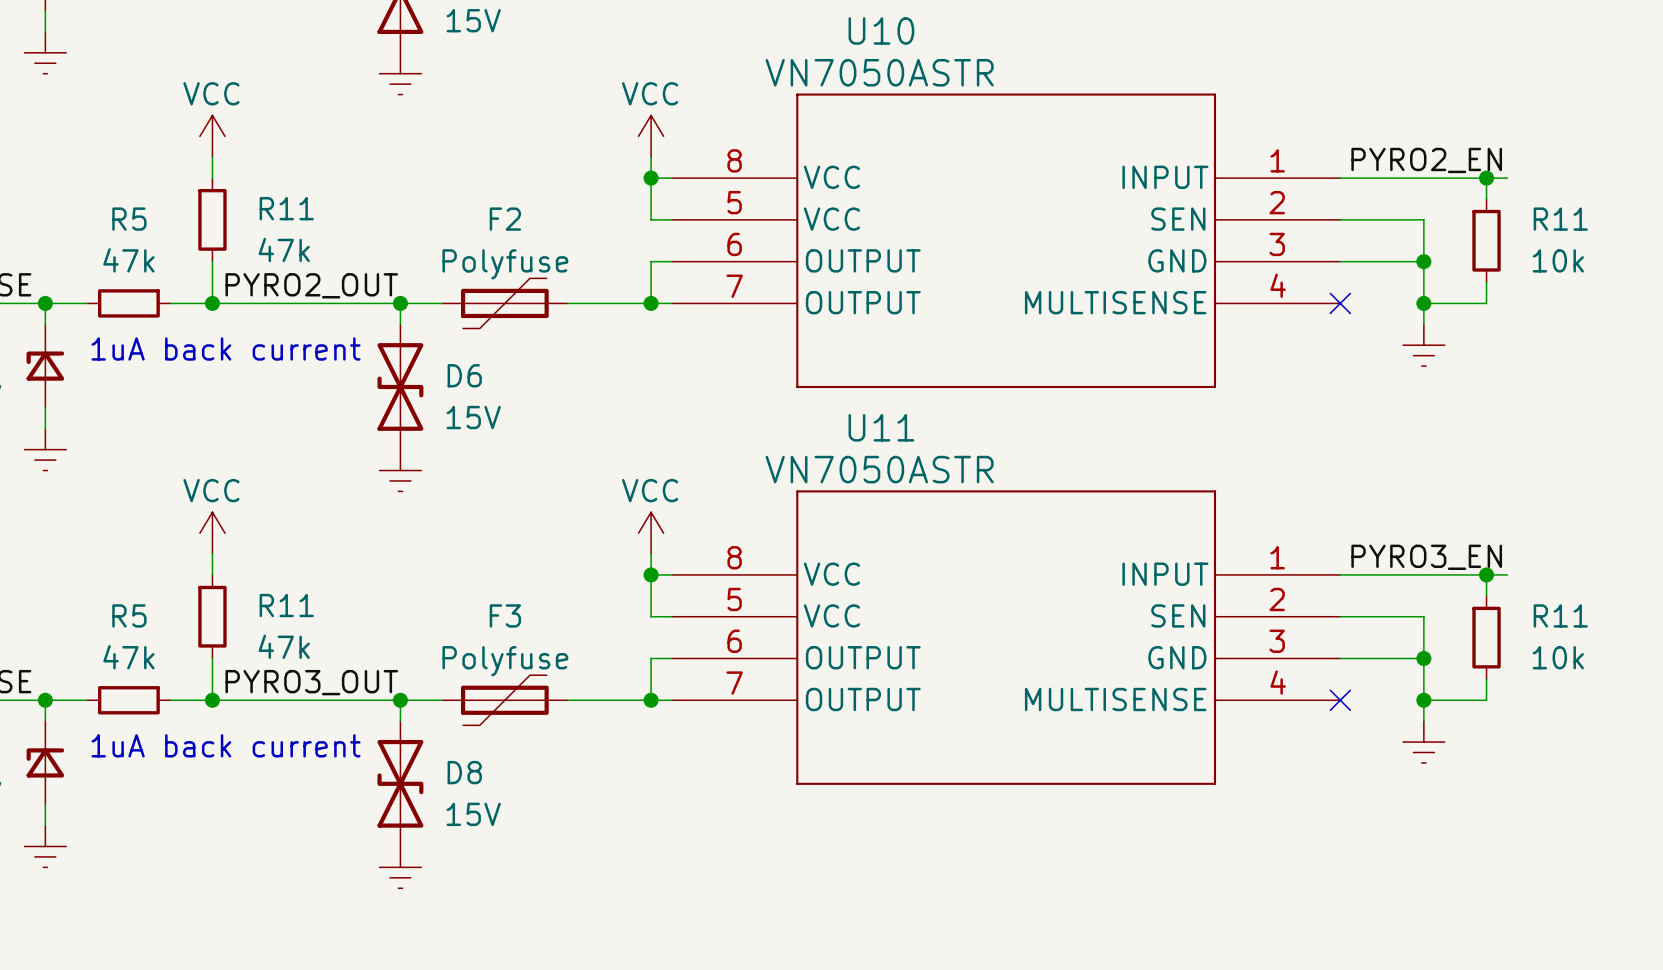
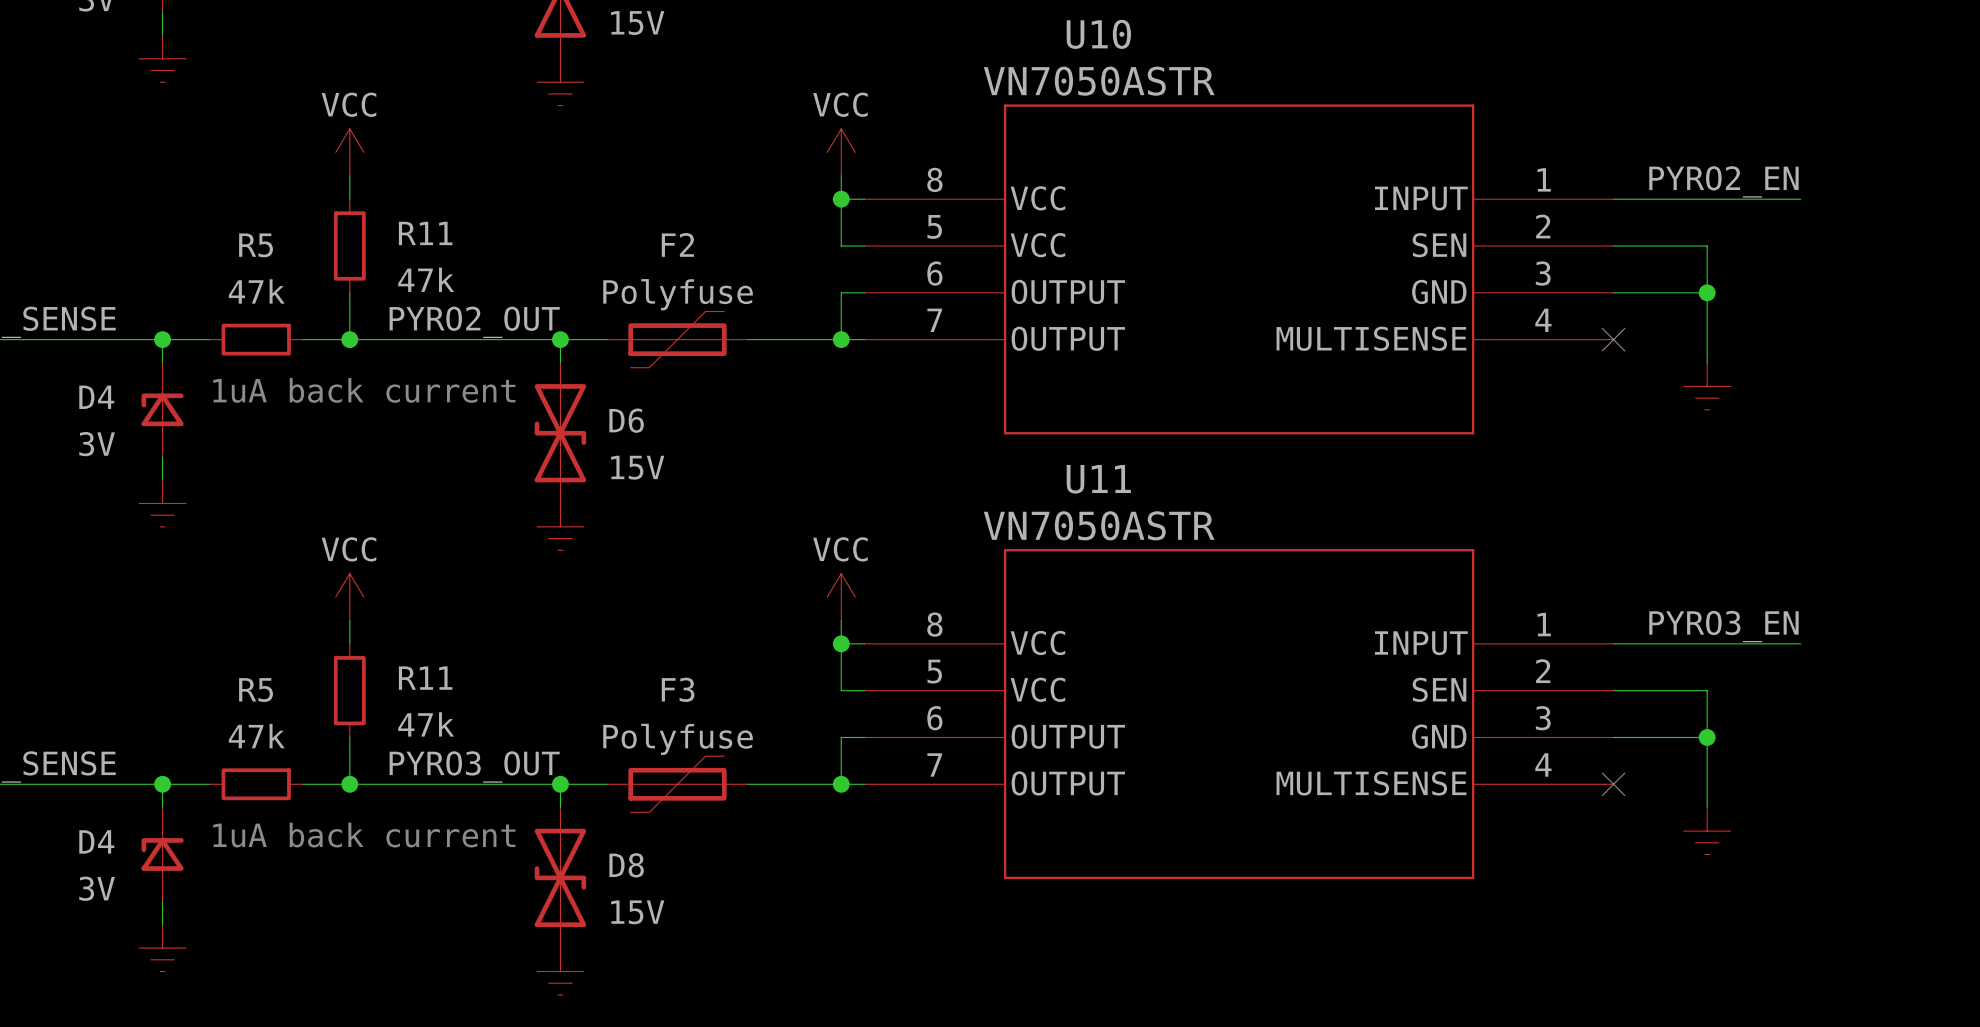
wire: (1486, 178) (1486, 199) -> none
junction: (1486, 178) -> none
R11: 10k (1486, 240) -> none
wire: (1486, 282) (1486, 303) (1423, 303) -> none
junction: (1423, 303) -> none
wire: (1486, 574) (1486, 595) -> none
junction: (1486, 574) -> none
R11: 10k (1486, 637) -> none
wire: (1486, 679) (1486, 700) (1423, 700) -> none
junction: (1423, 700) -> none

